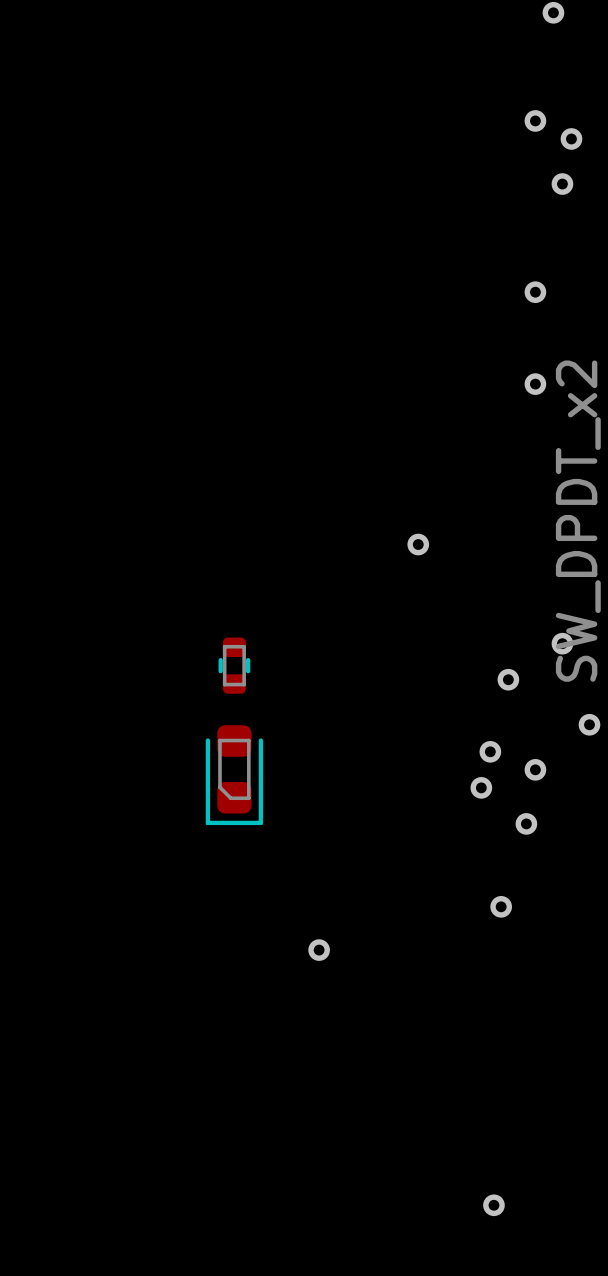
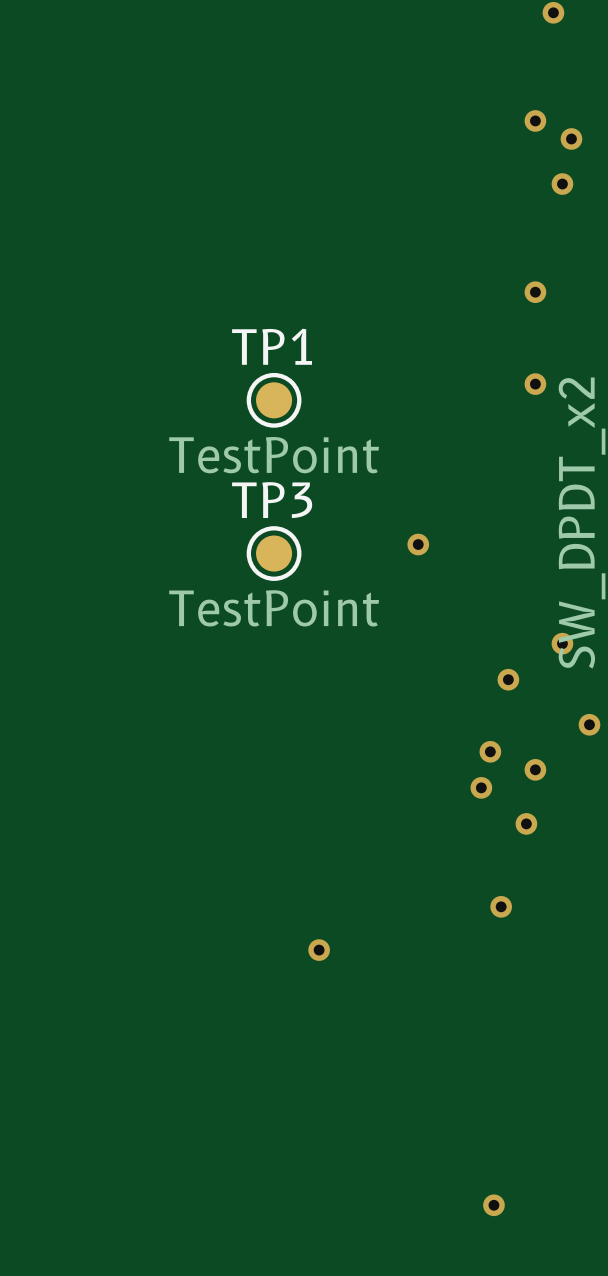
TP1: none -> TestPoint (274, 400)
TP3: none -> TestPoint (274, 553)
part: (234, 665) -> none
part: (234, 775) -> none

